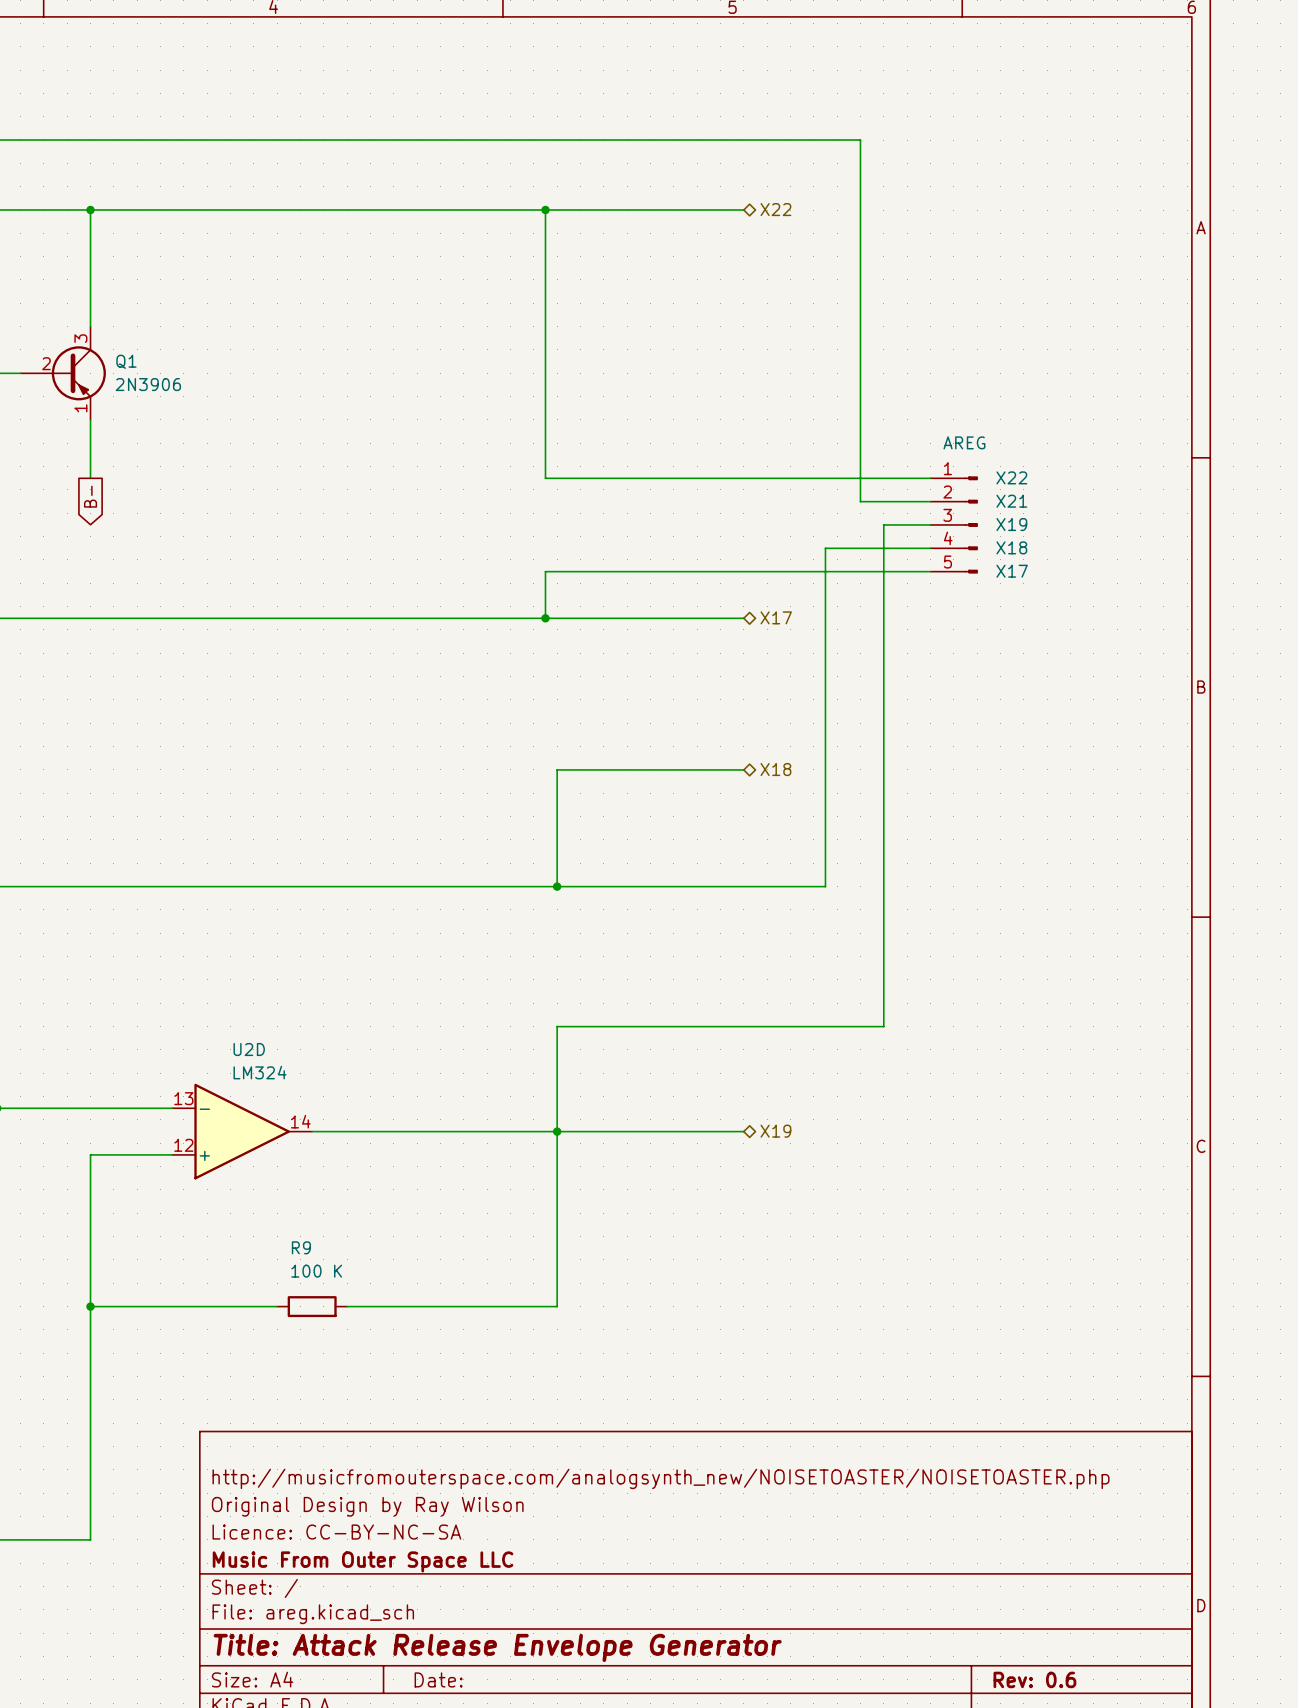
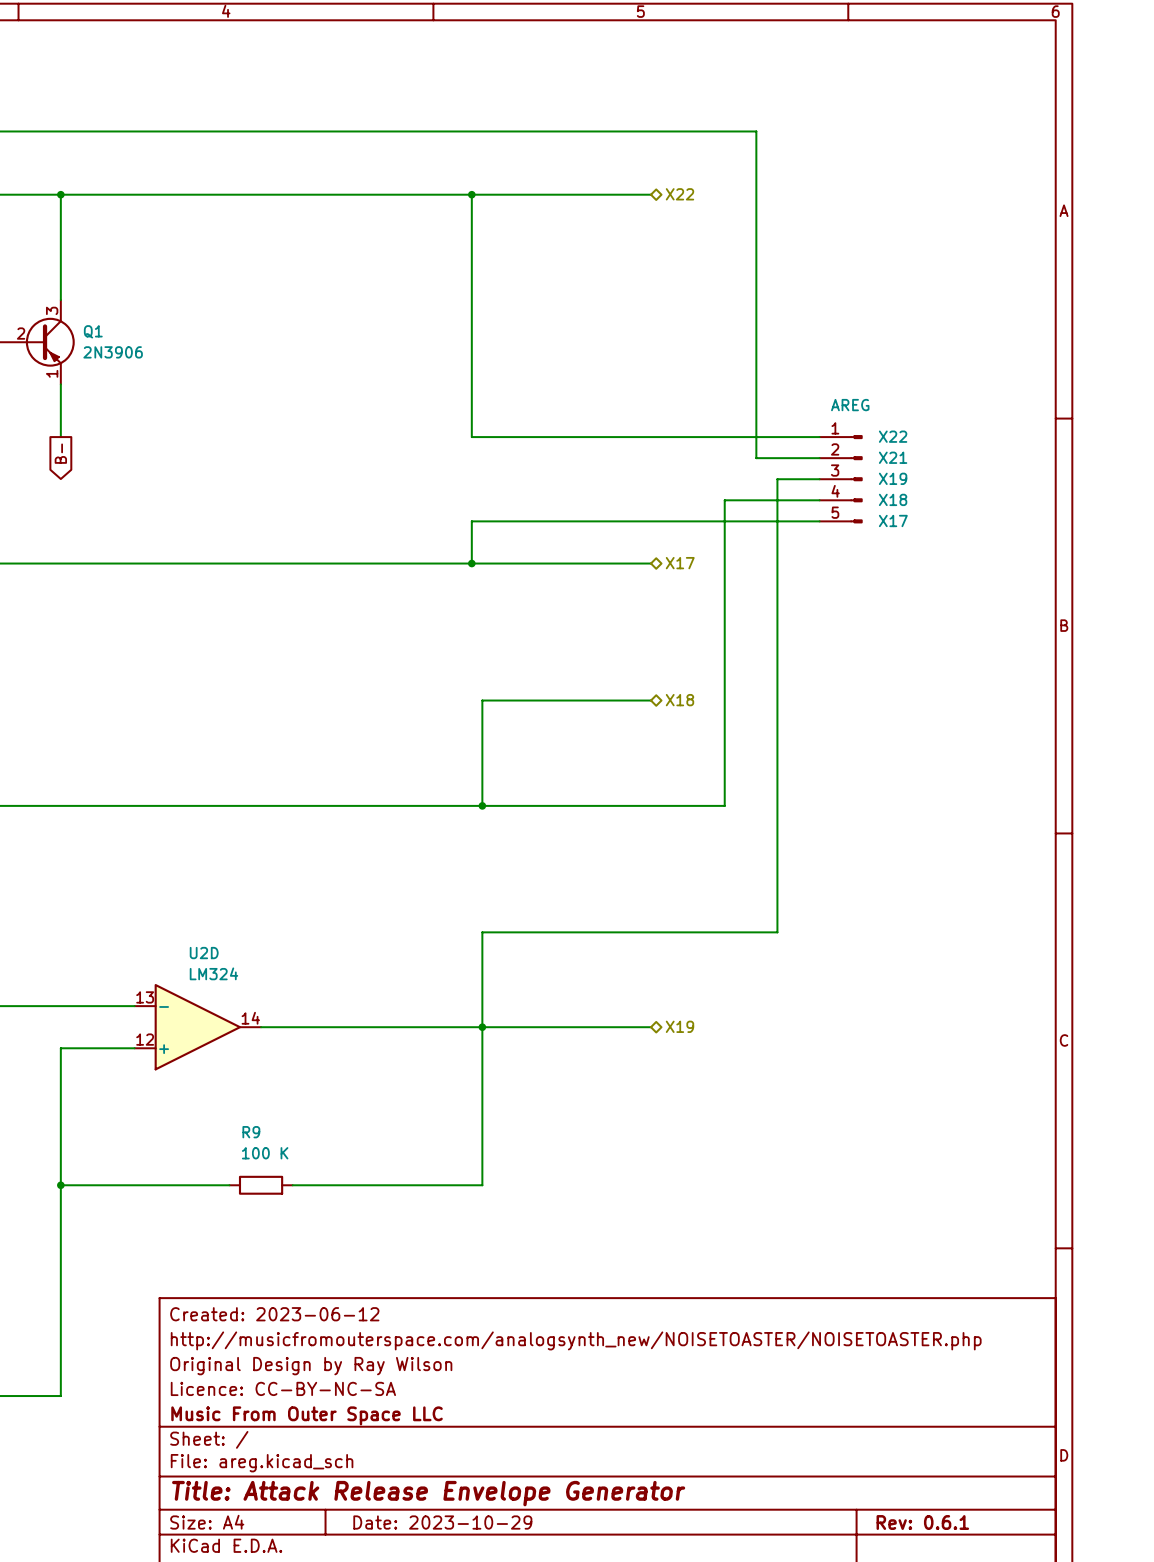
title block: none -> Created: 2023-06-12 (274, 1314)
title block: Date: (438, 1679) -> Date: 2023-10-29 (442, 1522)
title block: Rev: 0.6 (1034, 1679) -> Rev: 0.6.1 (922, 1522)

